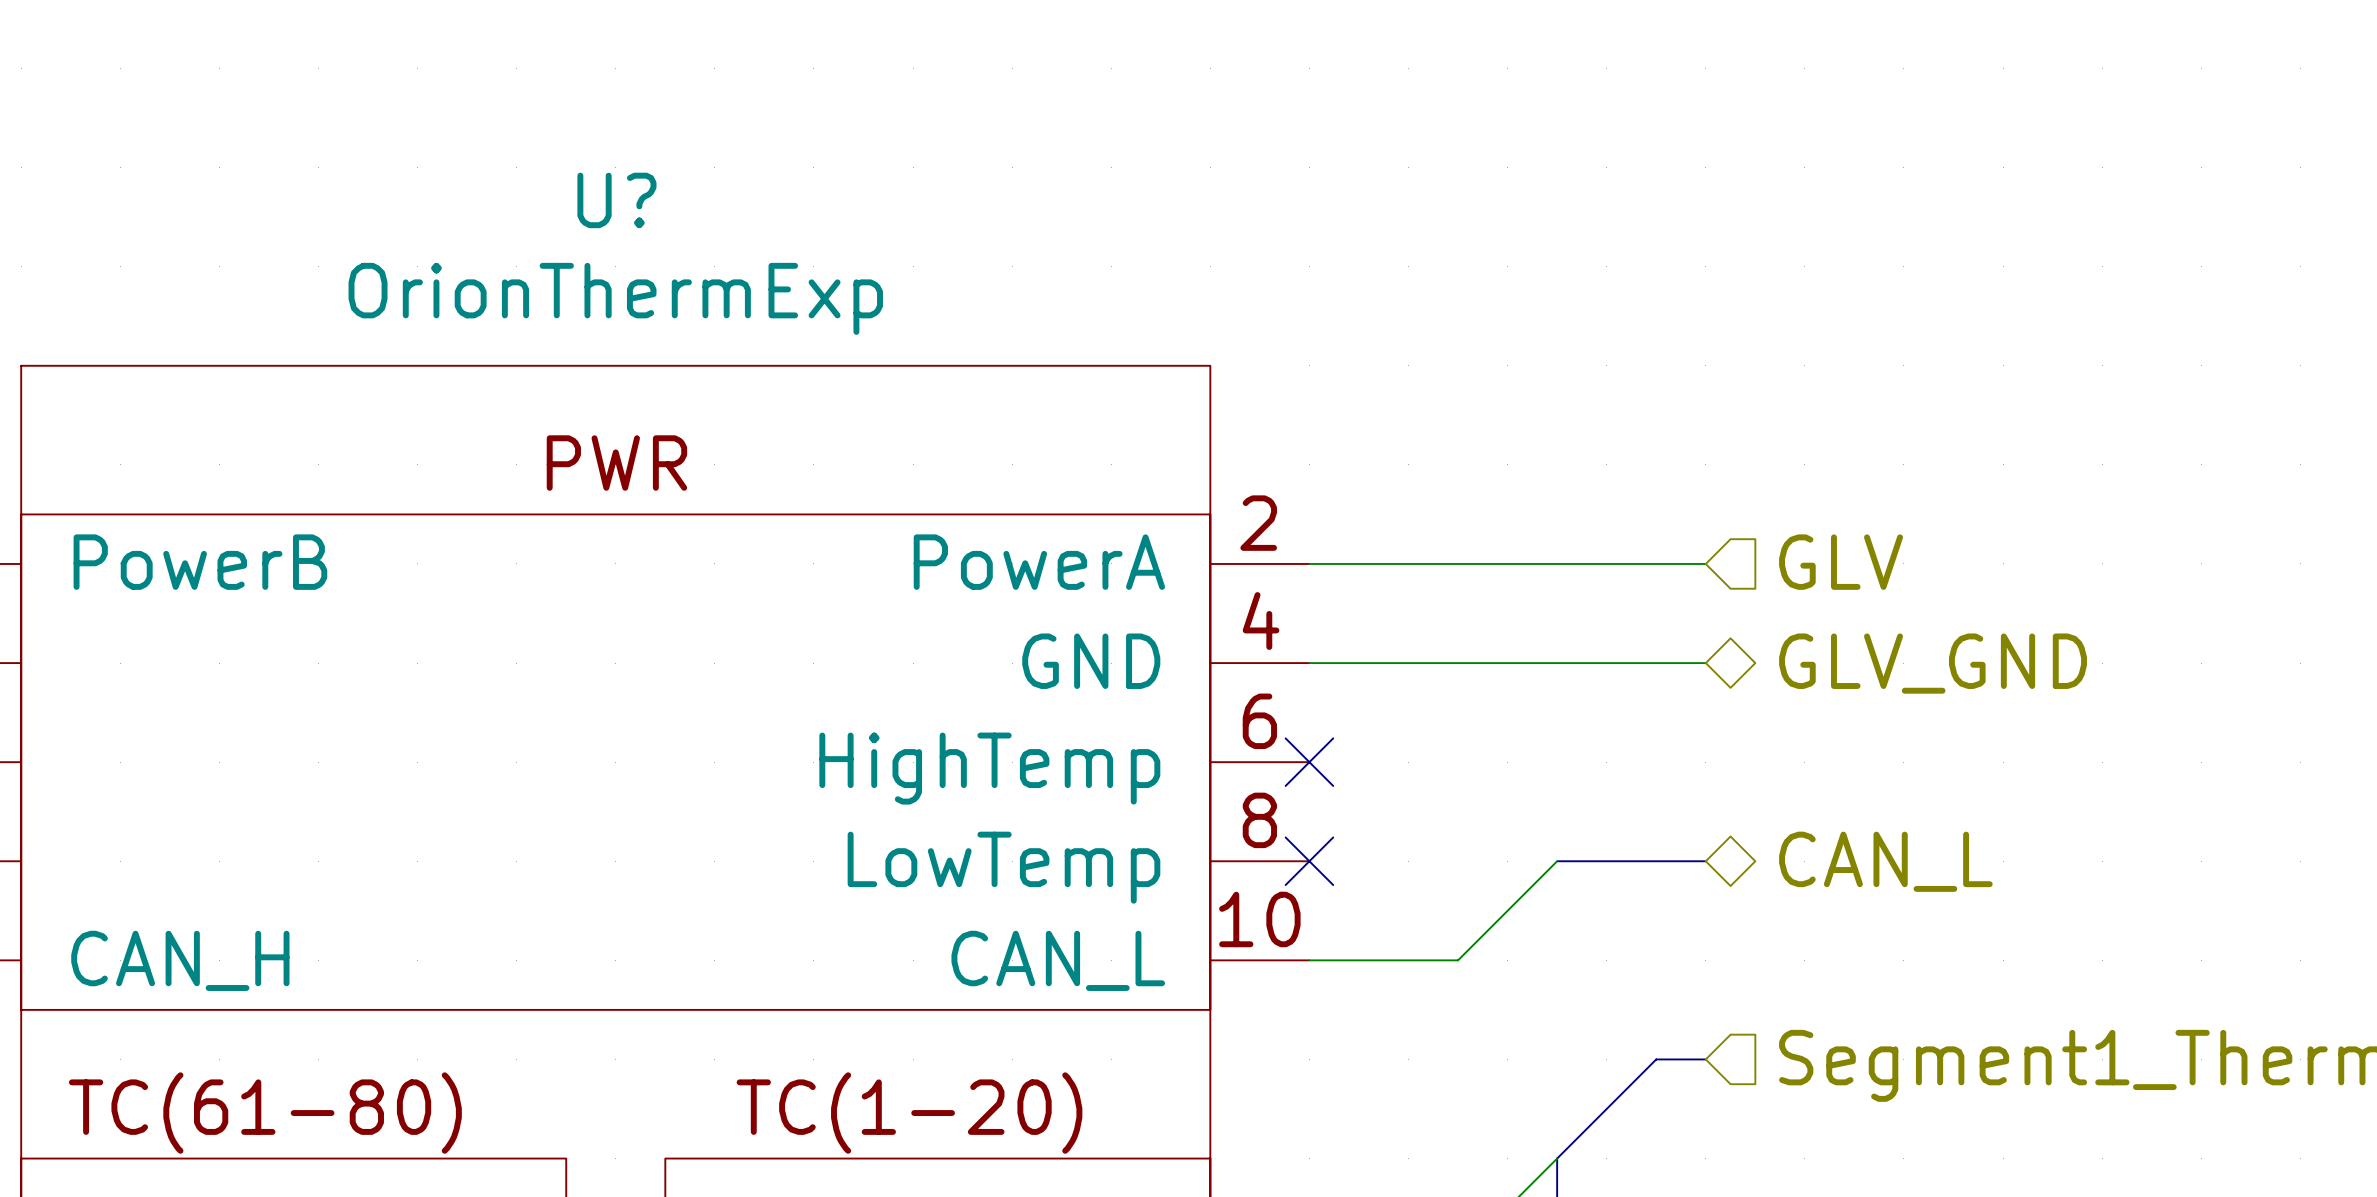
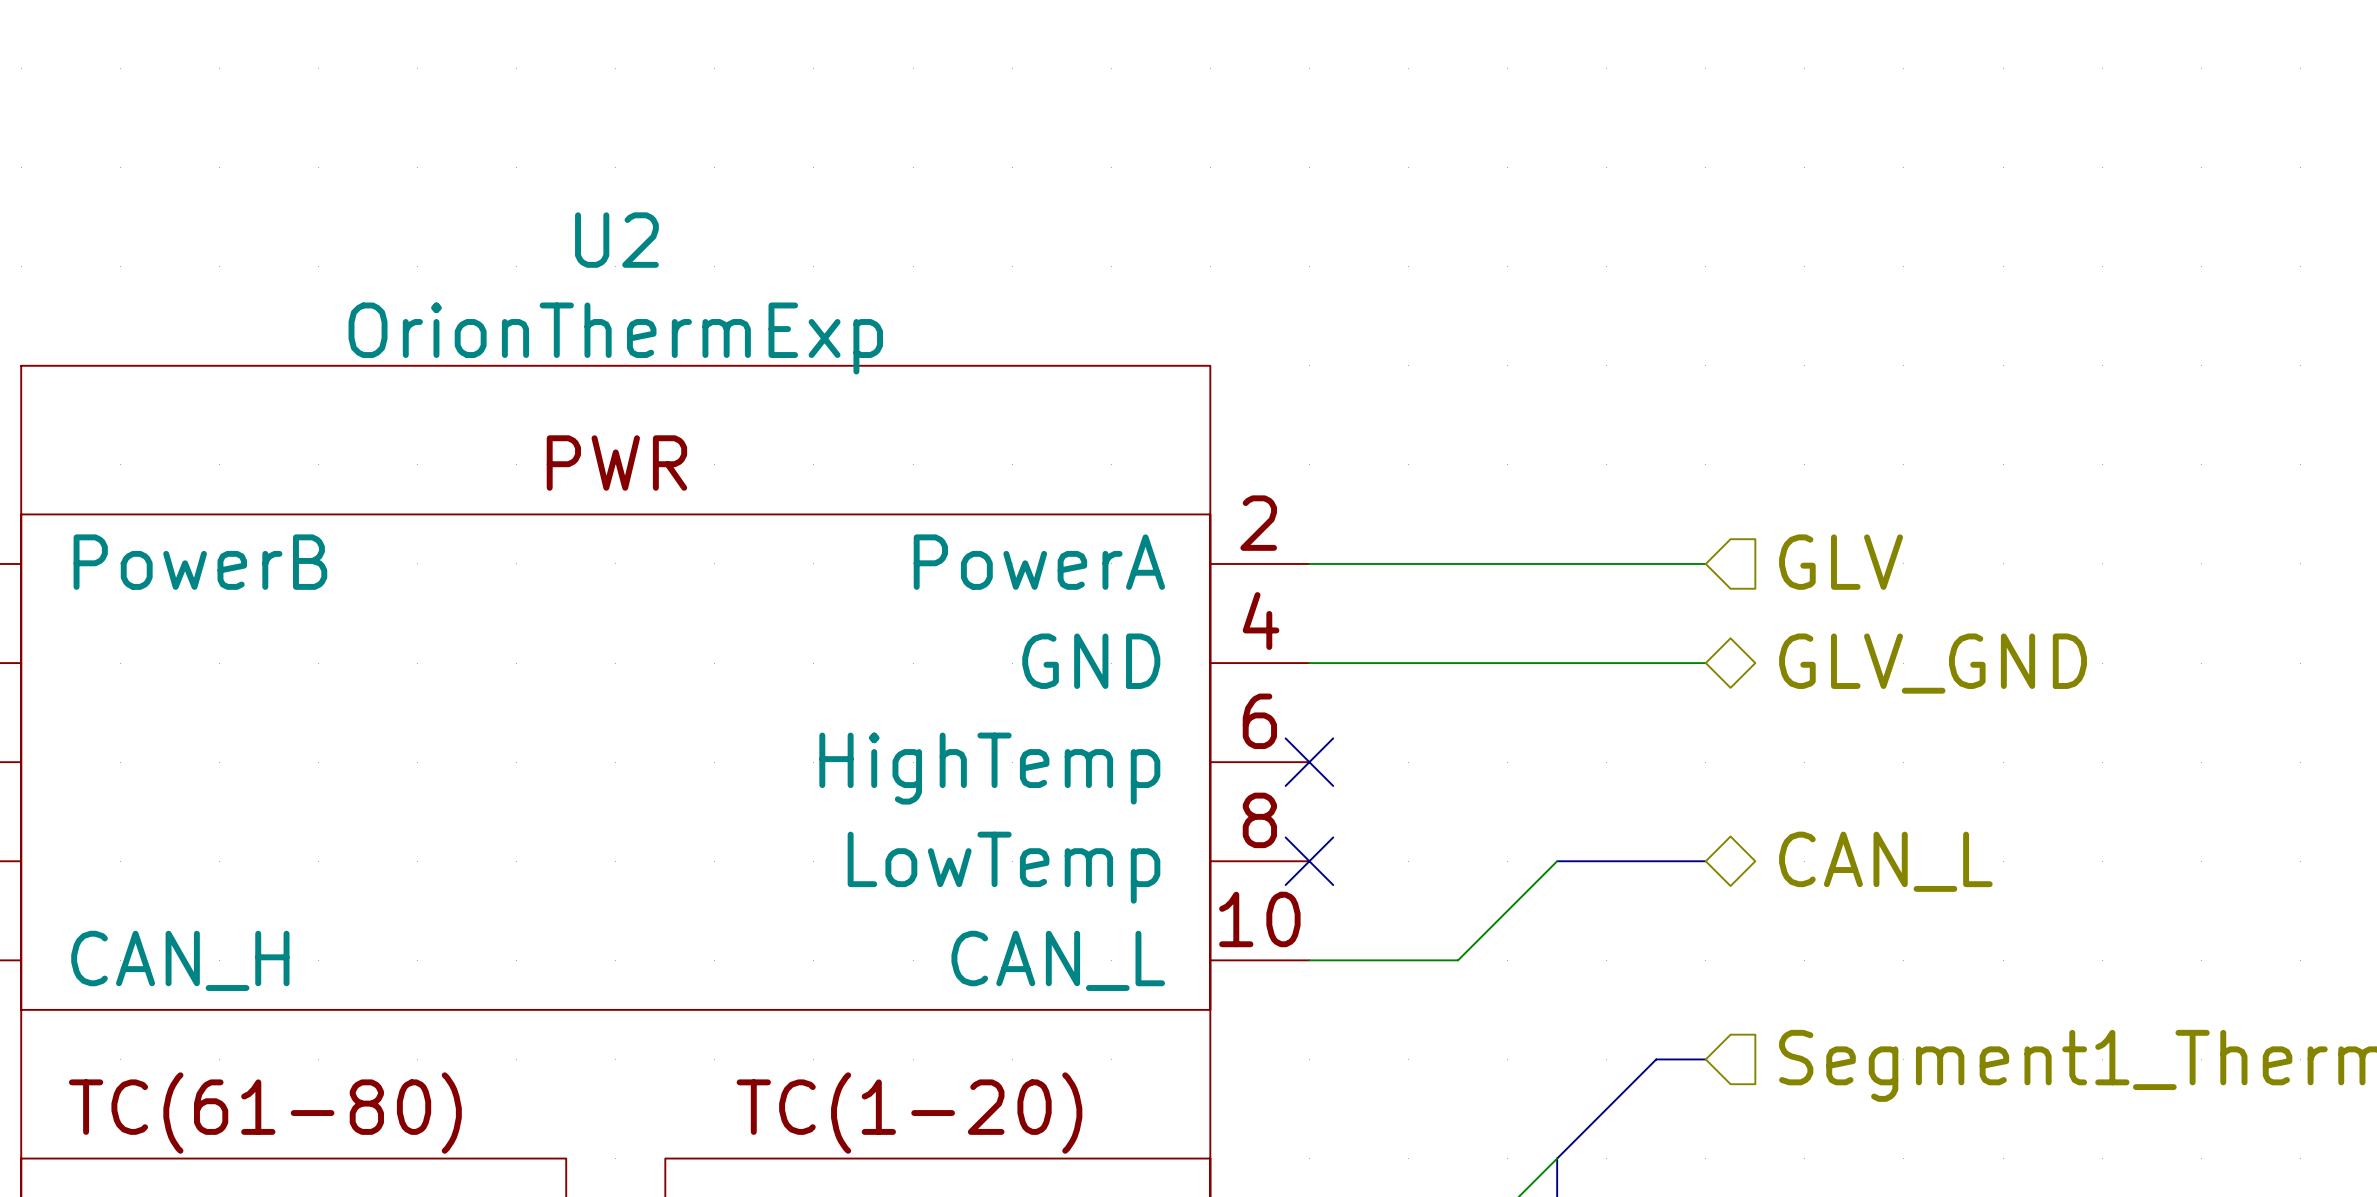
U? name: U? (616, 200) -> U2 (616, 240)
U? value position: OrionThermExp (615, 298) -> OrionThermExp (615, 338)

